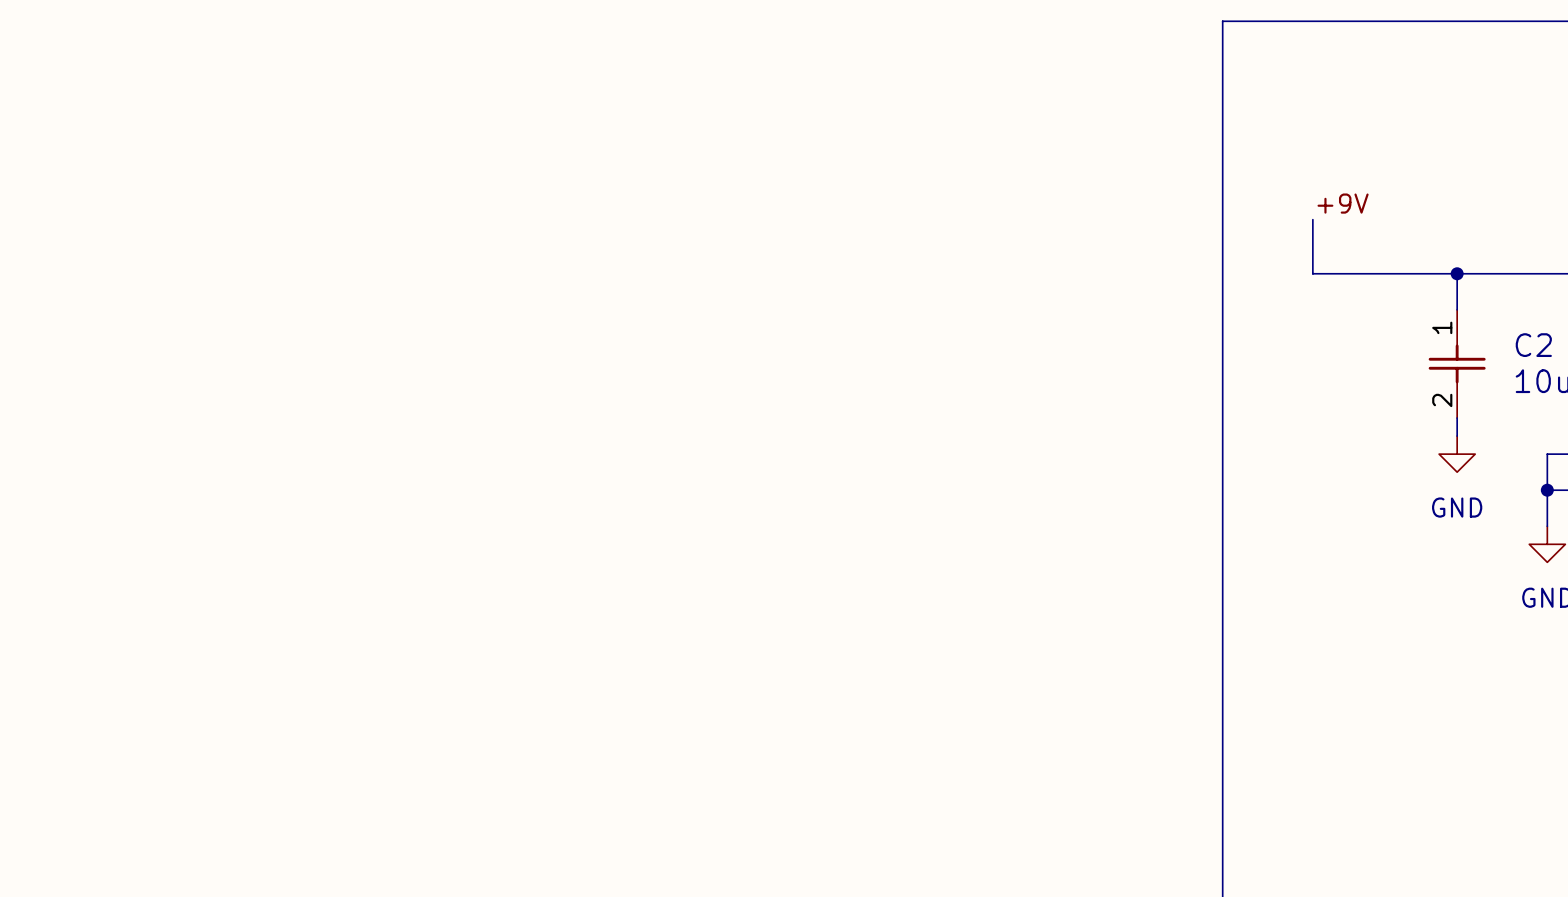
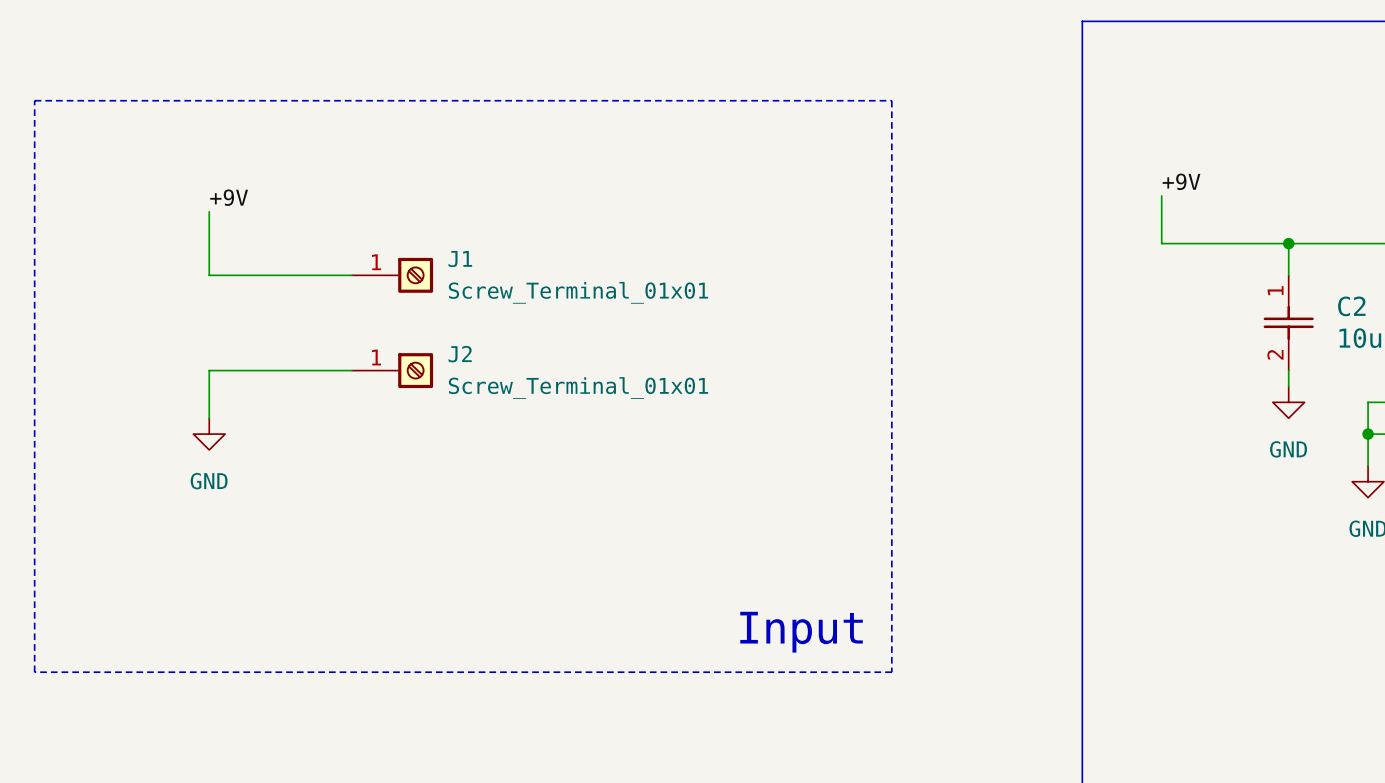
line: none -> (34, 100) (891, 100) (891, 672) (34, 672) (34, 100)
label: none -> +9V (229, 197)
wire: none -> (209, 211) (209, 275) (352, 275)
J1: none -> Screw_Terminal_01x01 (392, 275)
wire: none -> (352, 370) (209, 370) (209, 418)
J2: none -> Screw_Terminal_01x01 (392, 370)
power symbol: none -> GND (209, 434)
text: none -> Input (801, 632)

